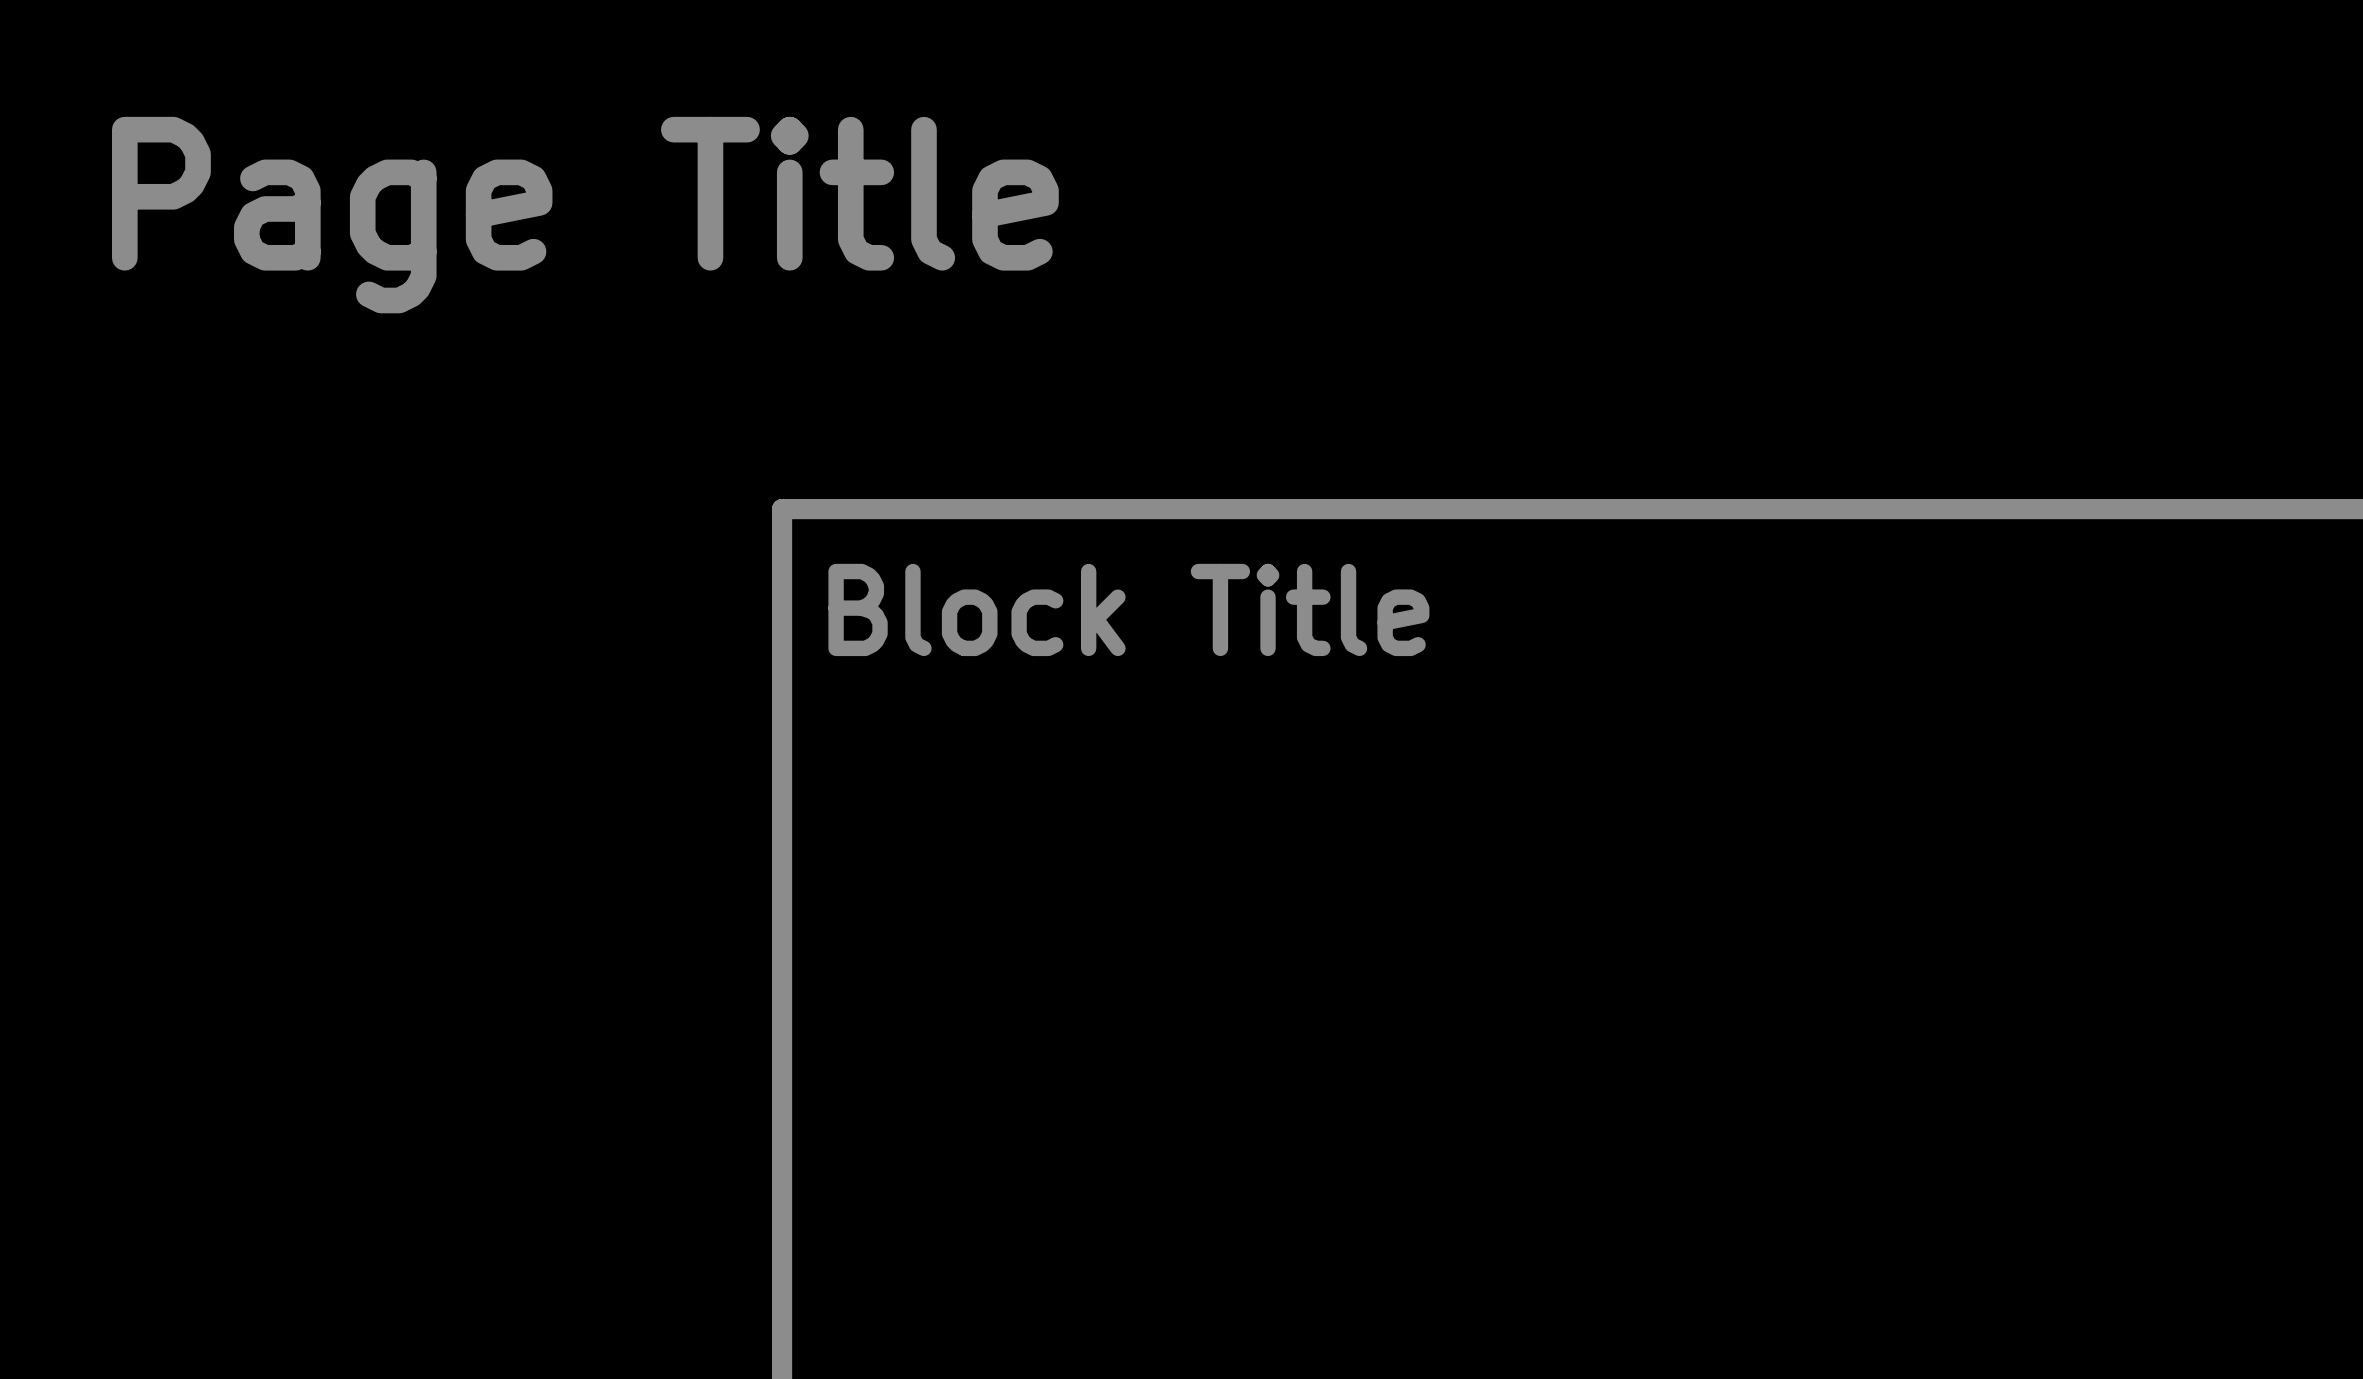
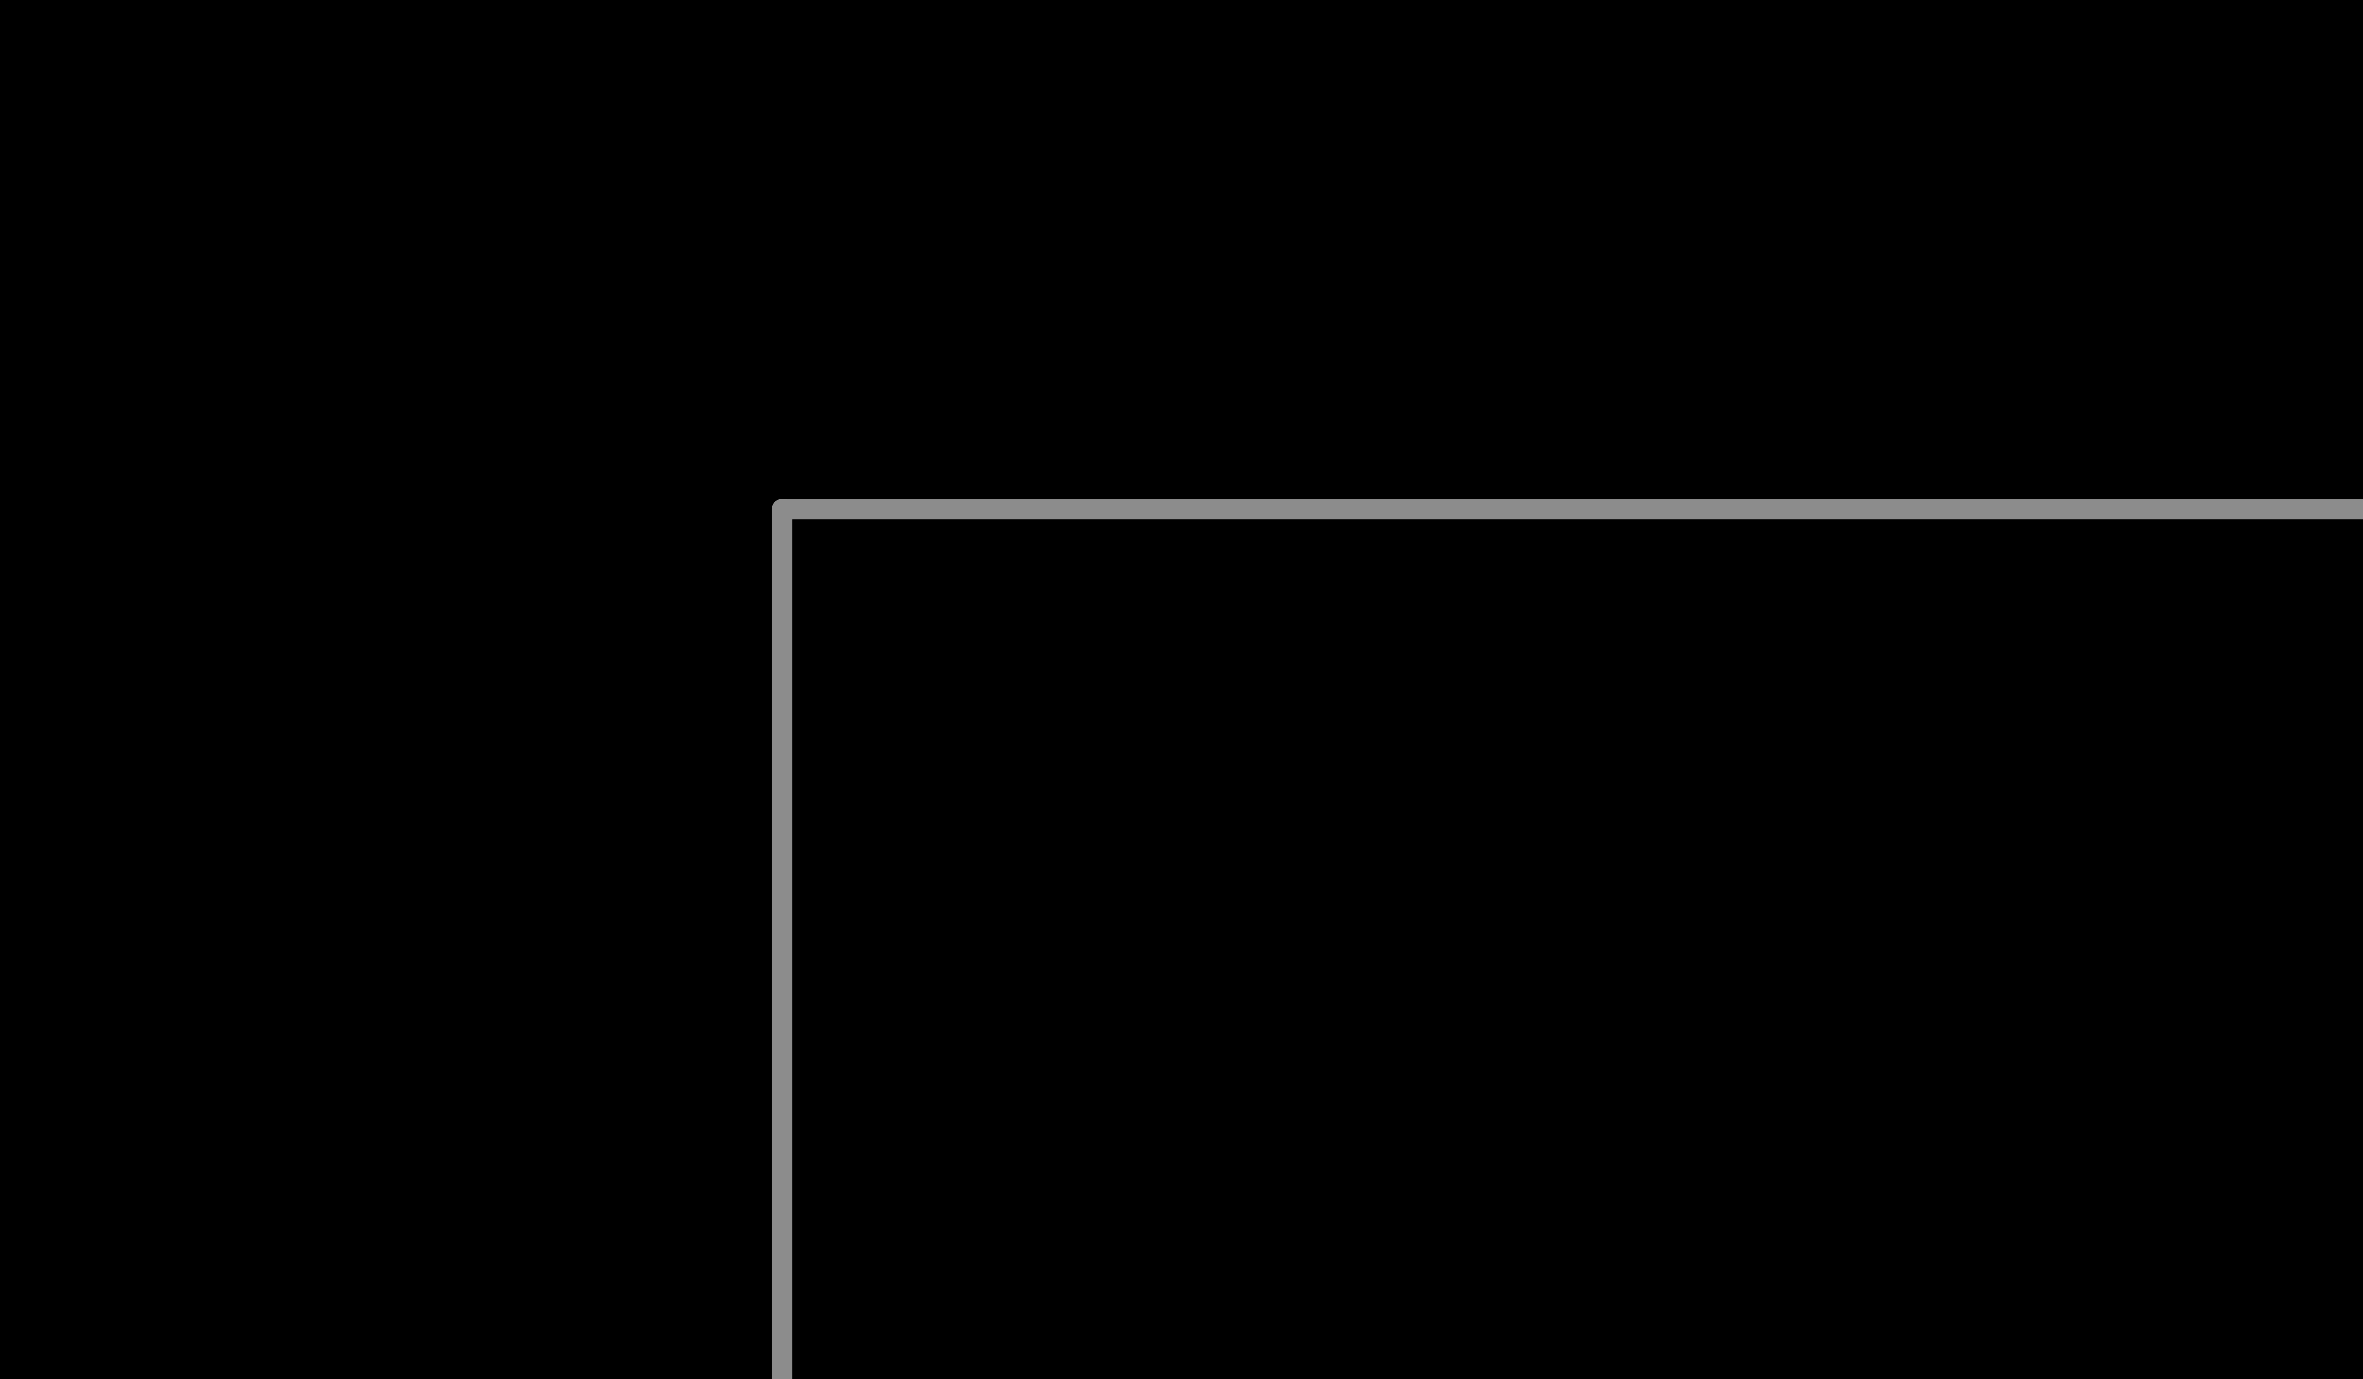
text: Page Title (585, 215) -> none
text: Block Title (1128, 609) -> none

